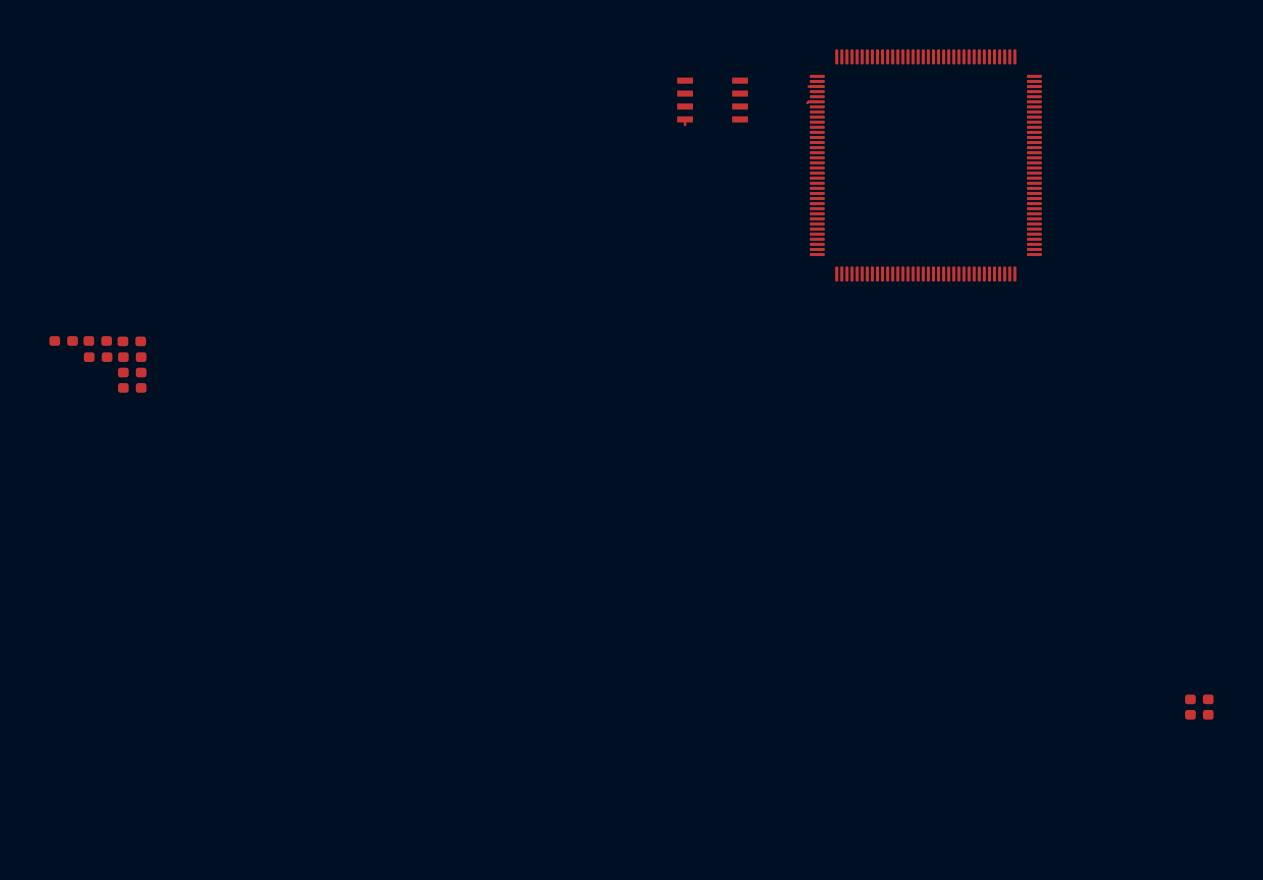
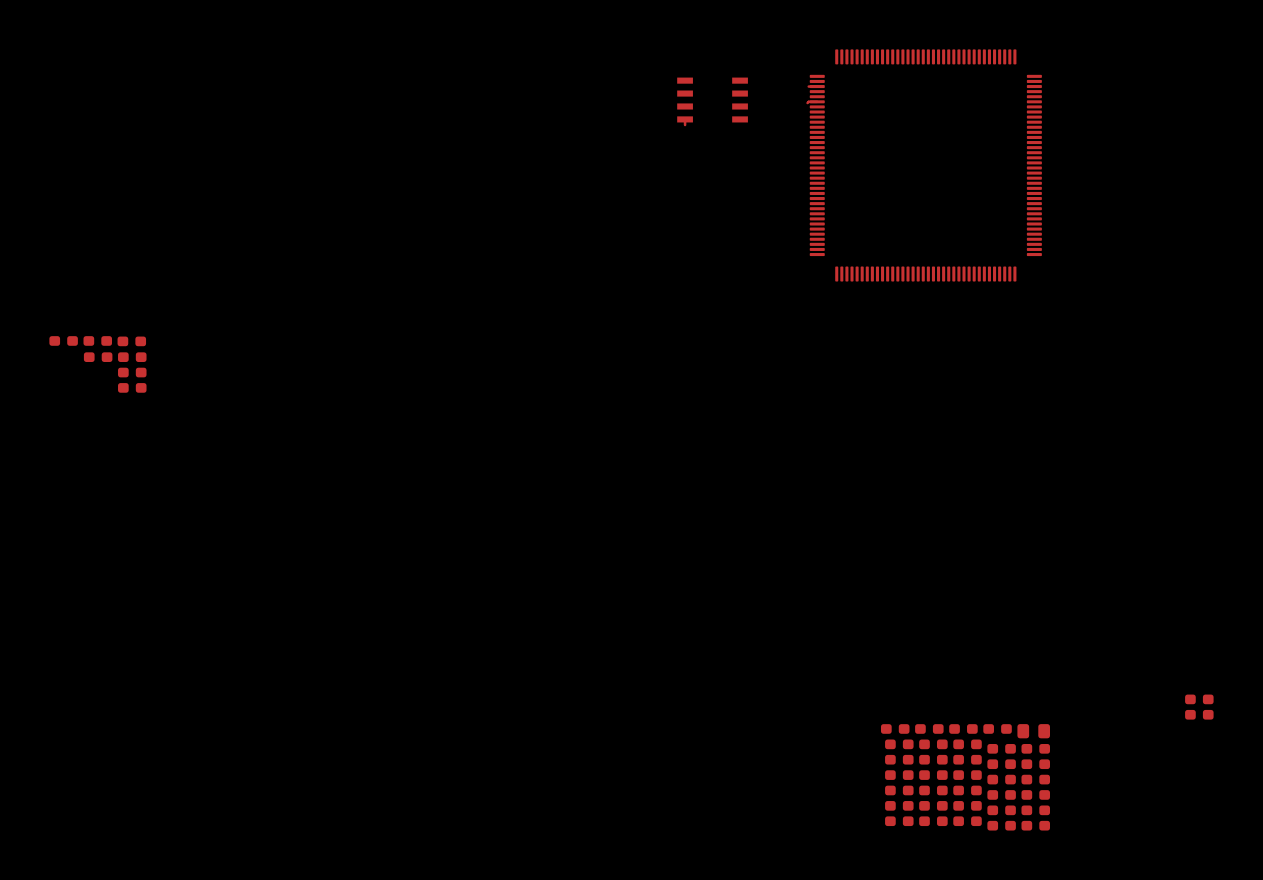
part: none -> (895, 728)
part: none -> (929, 728)
part: none -> (963, 728)
part: none -> (997, 728)
part: none -> (1033, 731)
part: none -> (899, 744)
part: none -> (933, 744)
part: none -> (967, 744)
part: none -> (1001, 748)
part: none -> (1035, 748)
part: none -> (899, 759)
part: none -> (933, 759)
part: none -> (967, 759)
part: none -> (1001, 764)
part: none -> (1035, 764)
part: none -> (899, 775)
part: none -> (933, 775)
part: none -> (967, 775)
part: none -> (1001, 779)
part: none -> (1035, 779)
part: none -> (899, 790)
part: none -> (933, 790)
part: none -> (967, 790)
part: none -> (1001, 794)
part: none -> (1035, 794)
part: none -> (899, 805)
part: none -> (933, 805)
part: none -> (967, 805)
part: none -> (1001, 810)
part: none -> (1035, 810)
part: none -> (899, 821)
part: none -> (933, 821)
part: none -> (967, 821)
part: none -> (1001, 825)
part: none -> (1035, 825)

